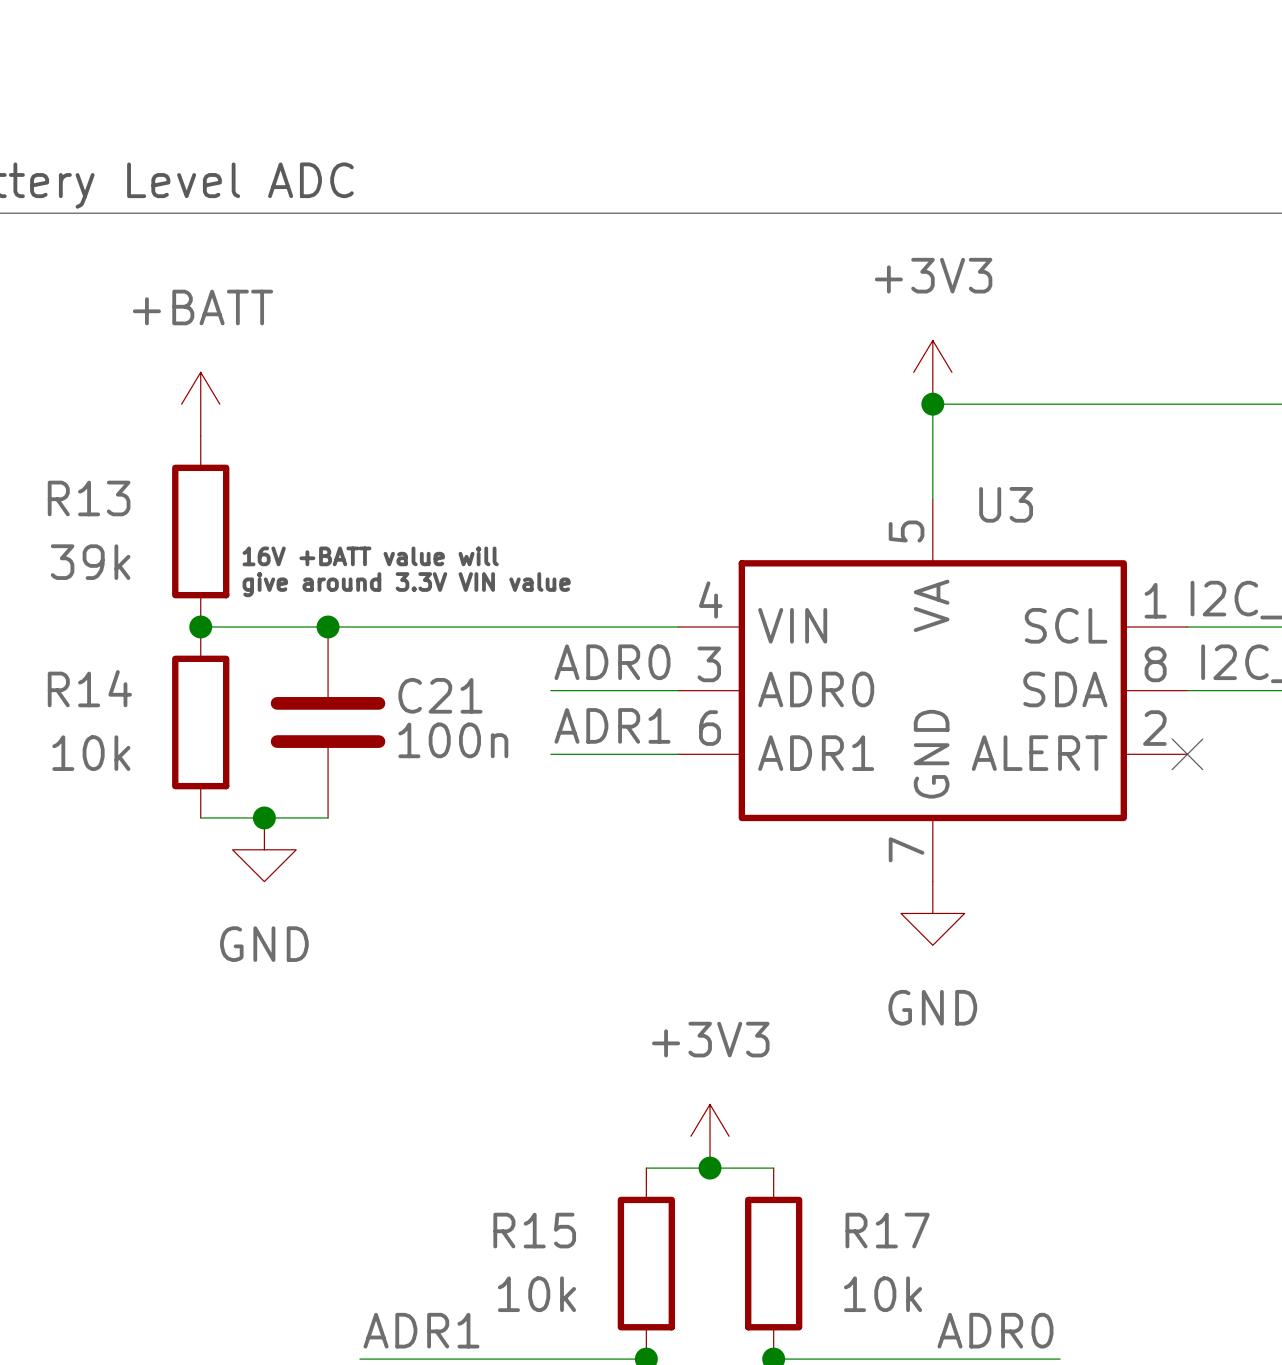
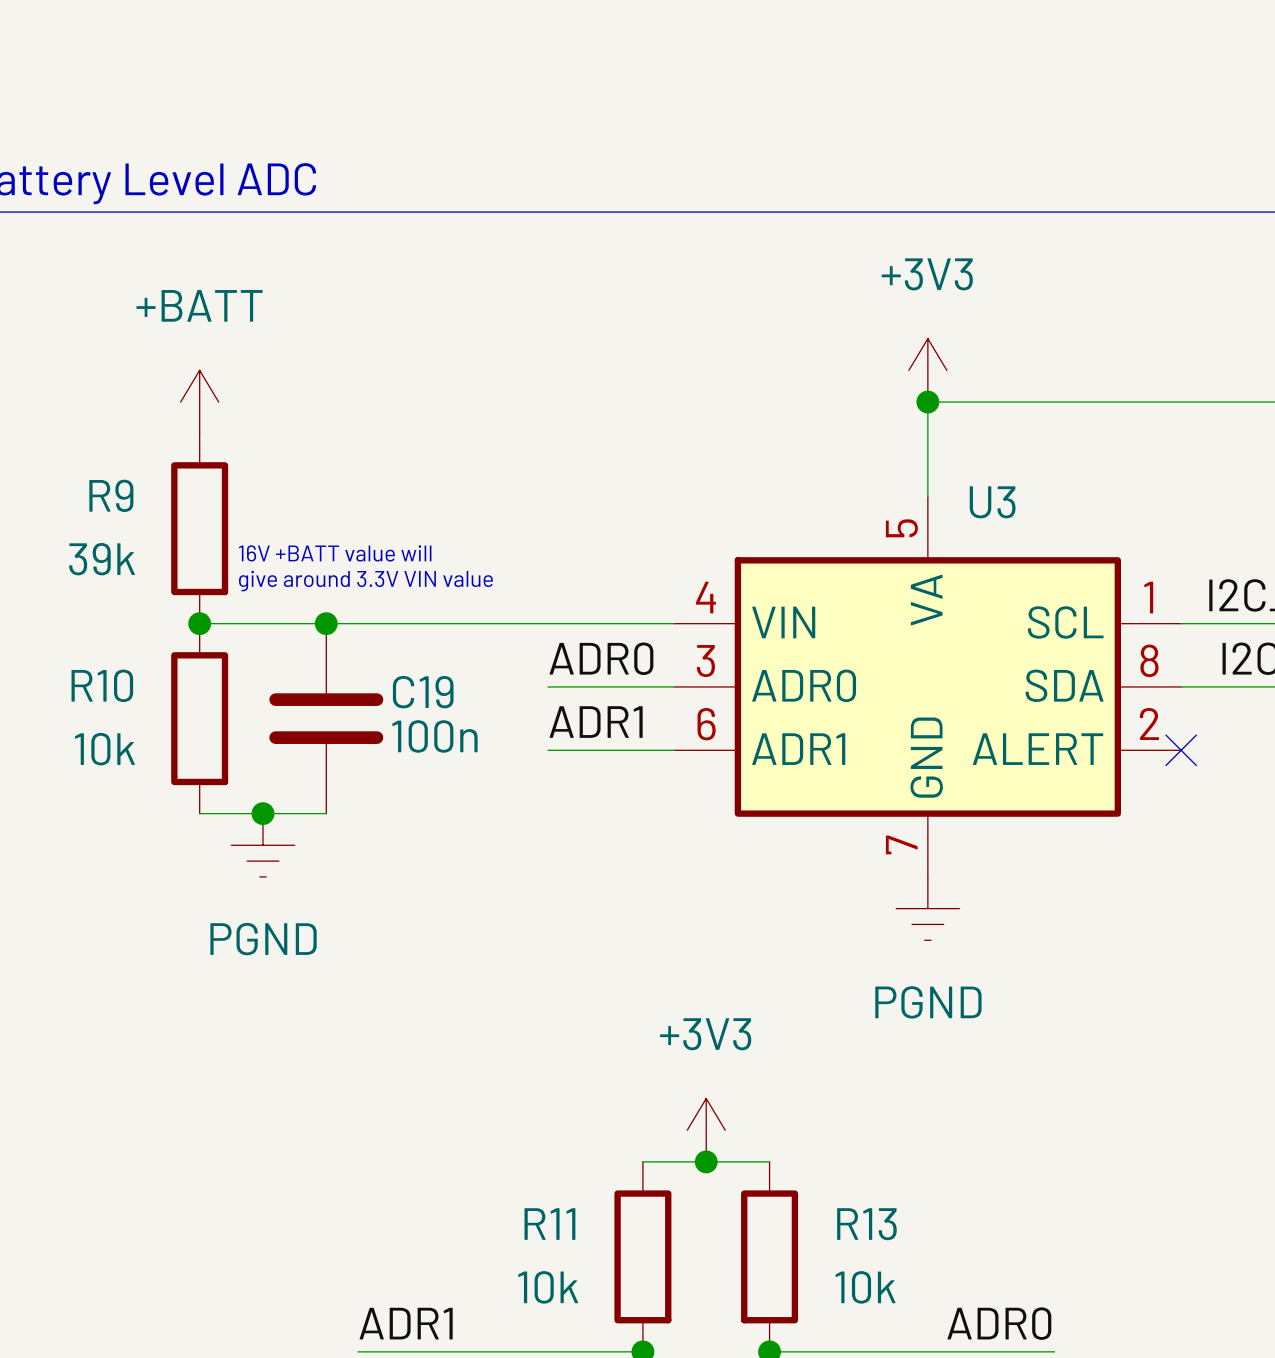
R13 name: R13 (89, 498) -> R9 (111, 495)
R14 name: R14 (89, 688) -> R10 (102, 685)
C21 name: C21 (440, 695) -> C19 (423, 692)
power symbol: GND (264, 849) -> PGND (262, 845)
power symbol: GND (932, 913) -> PGND (927, 908)
R15 name: R15 (534, 1230) -> R11 (549, 1224)
R17 name: R17 (887, 1230) -> R13 (866, 1224)

